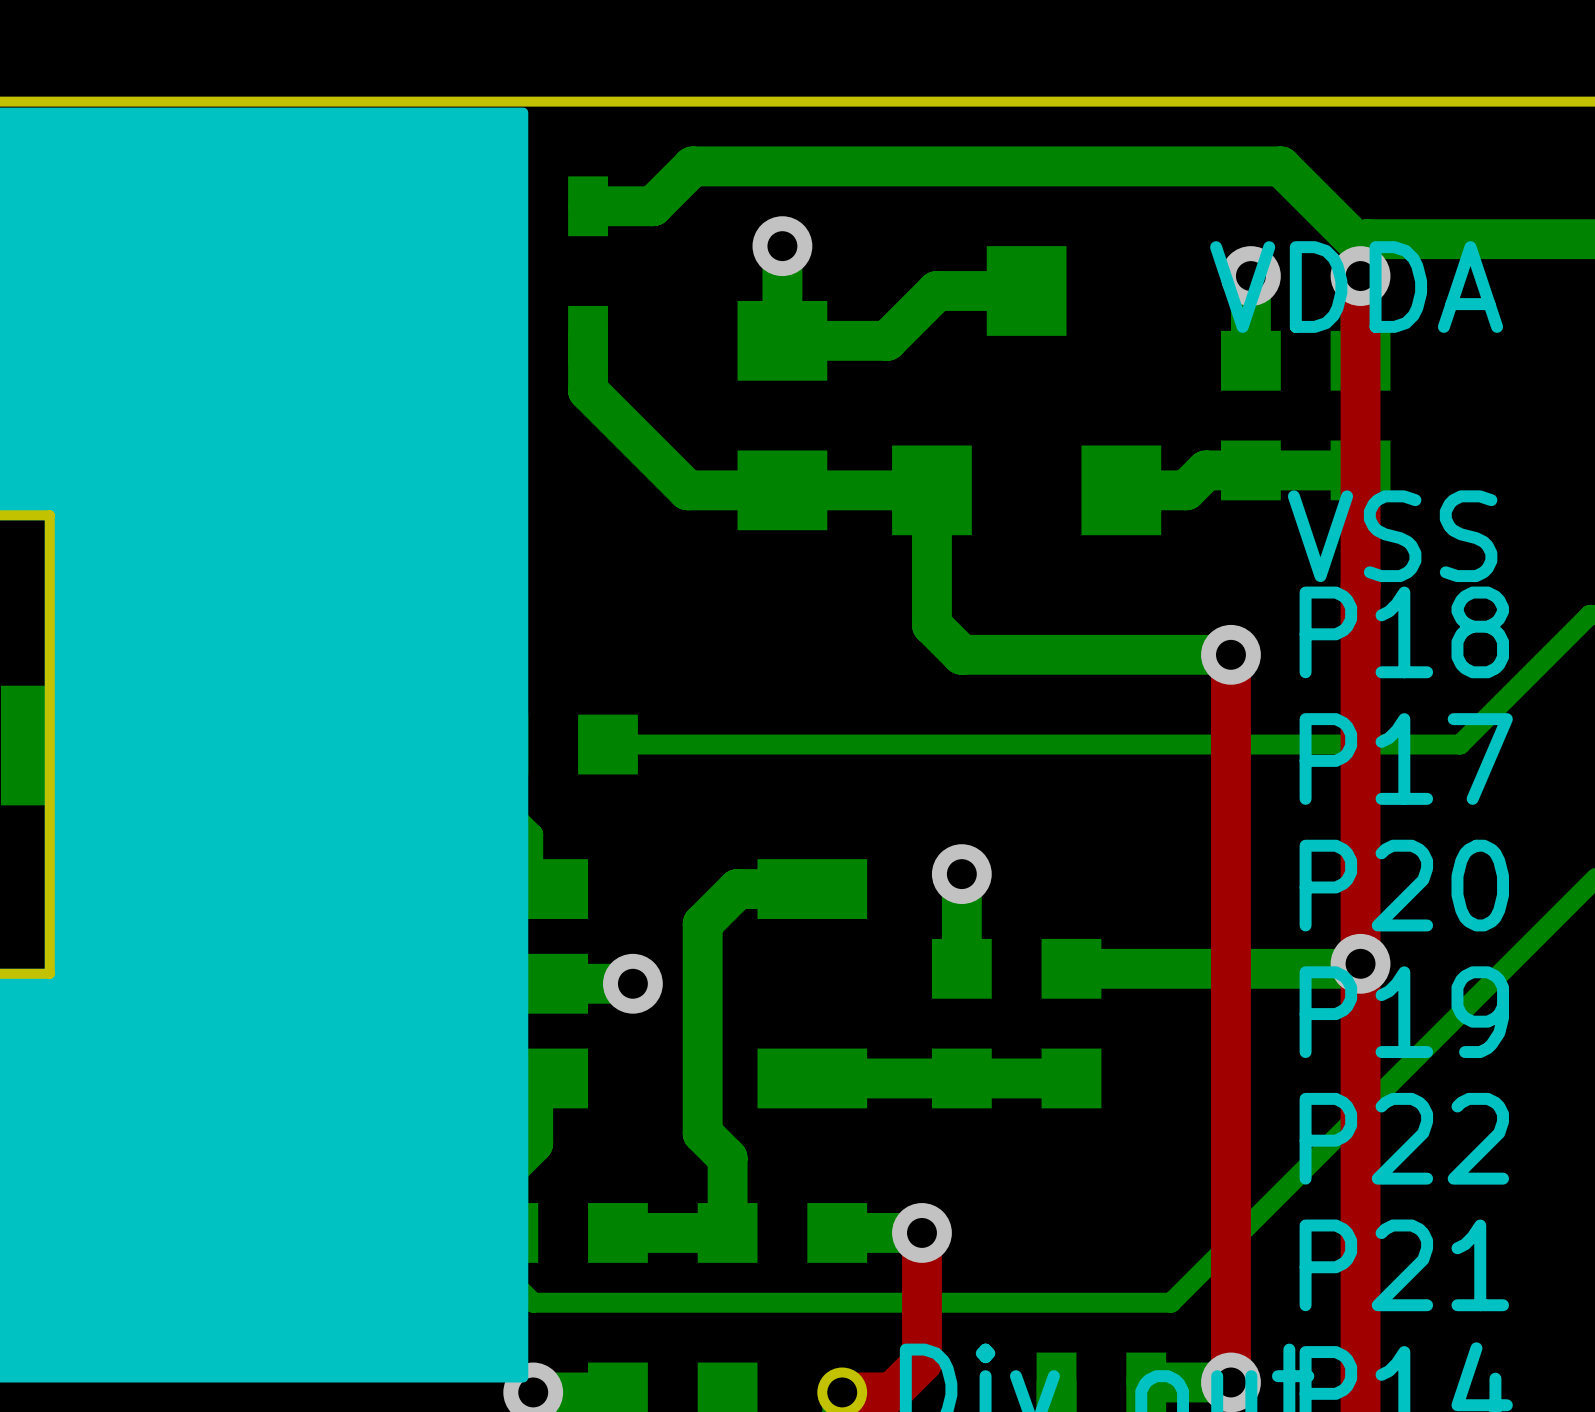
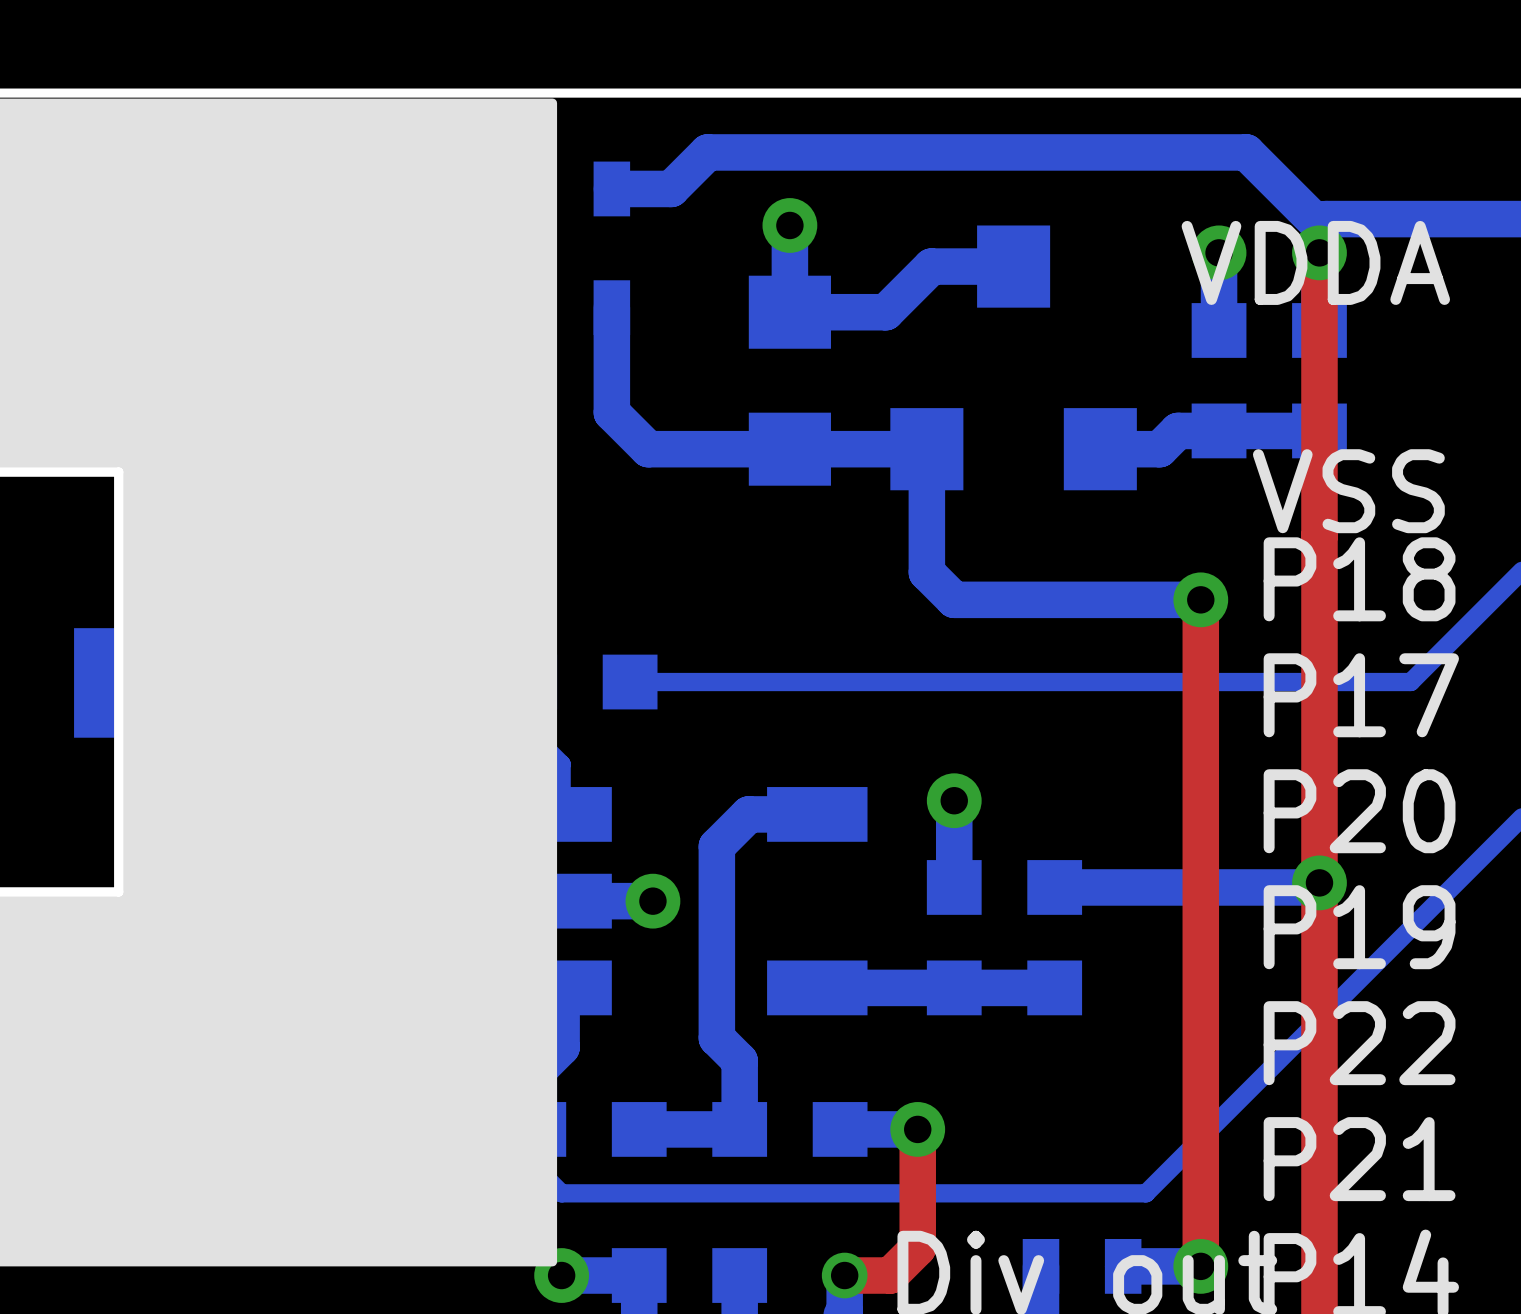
bottom track: (588, 390) (687, 490) -> (611, 357) (611, 412) (648, 449) (703, 449)

